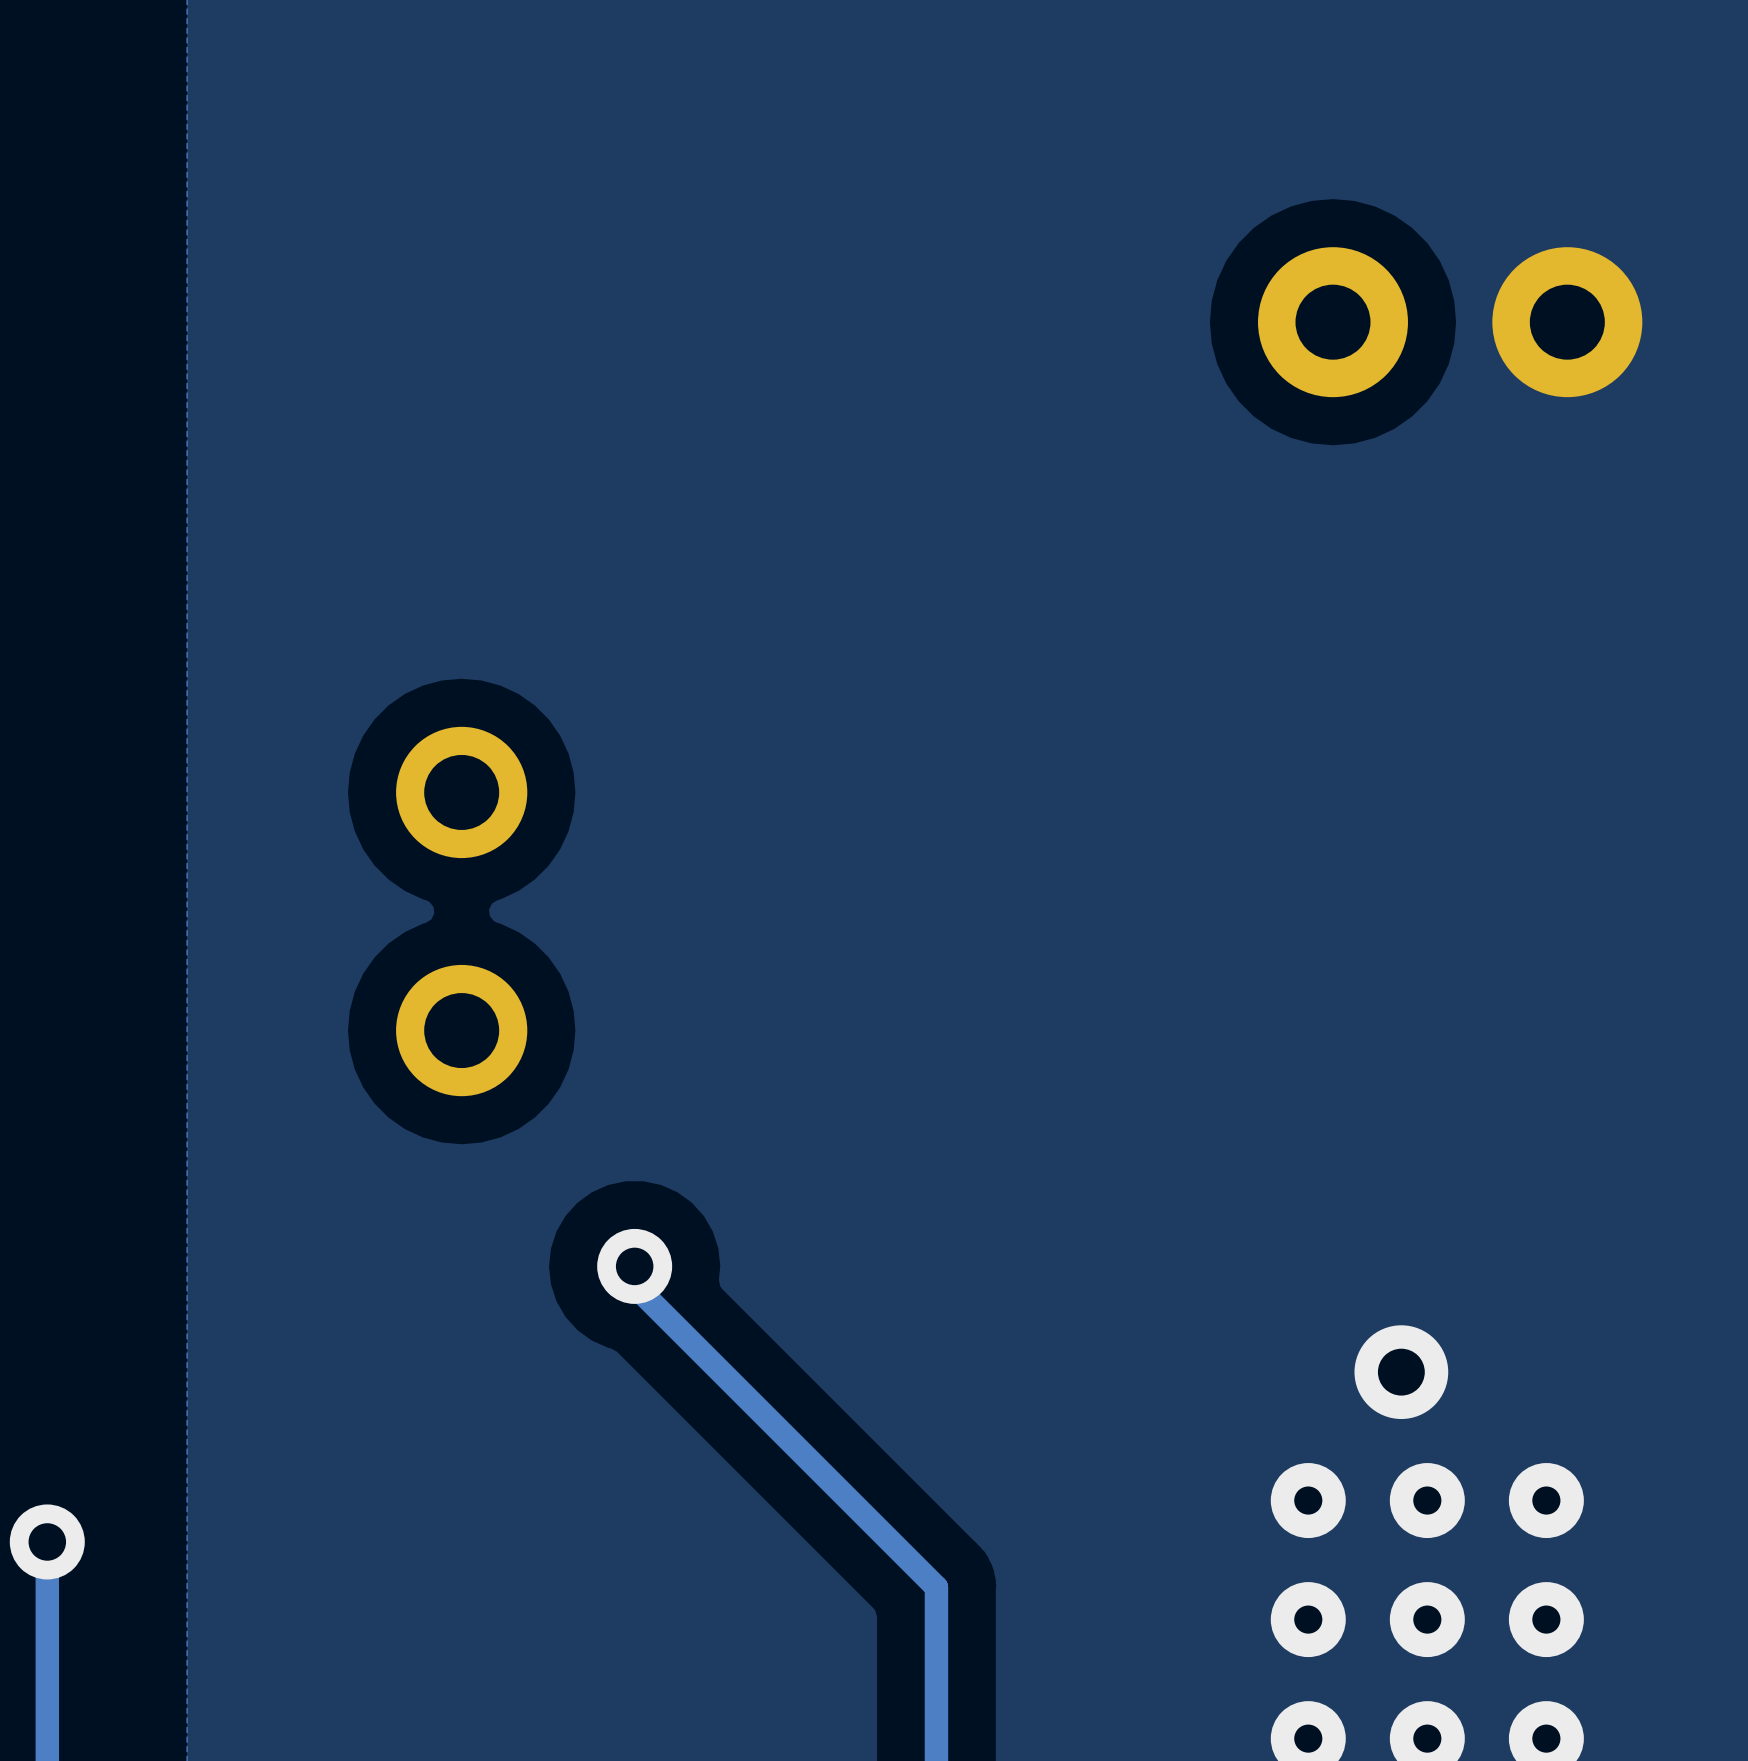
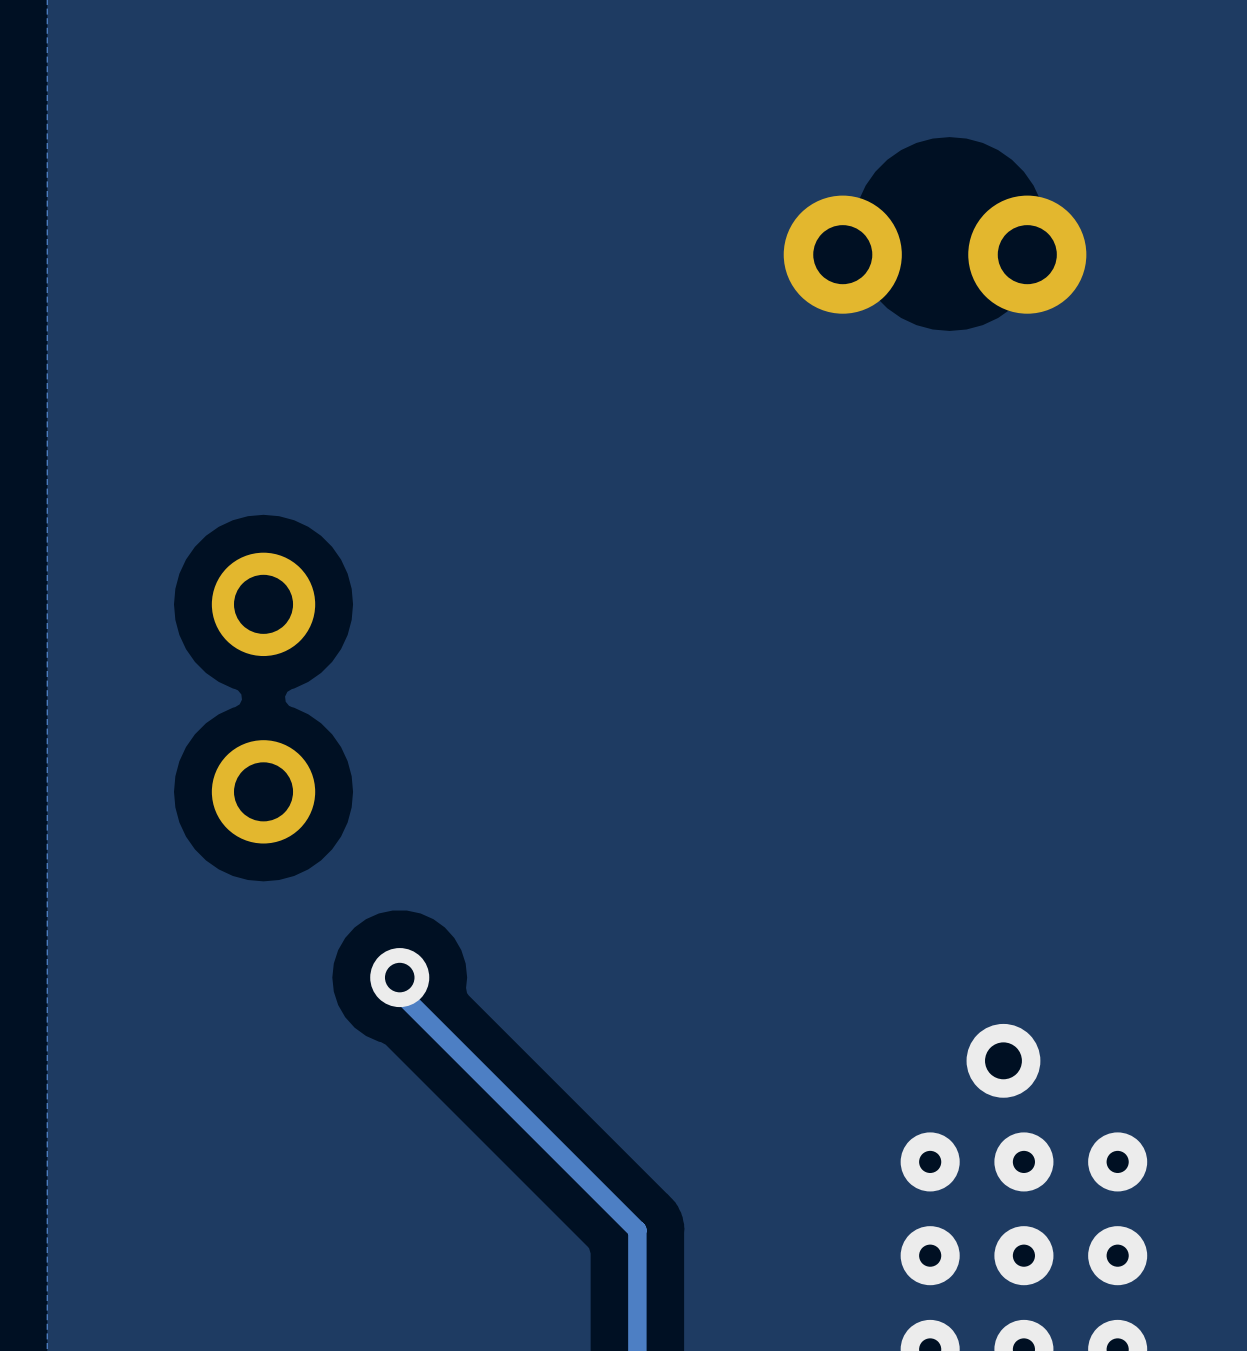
part position: (1450, 322) -> (935, 254)

